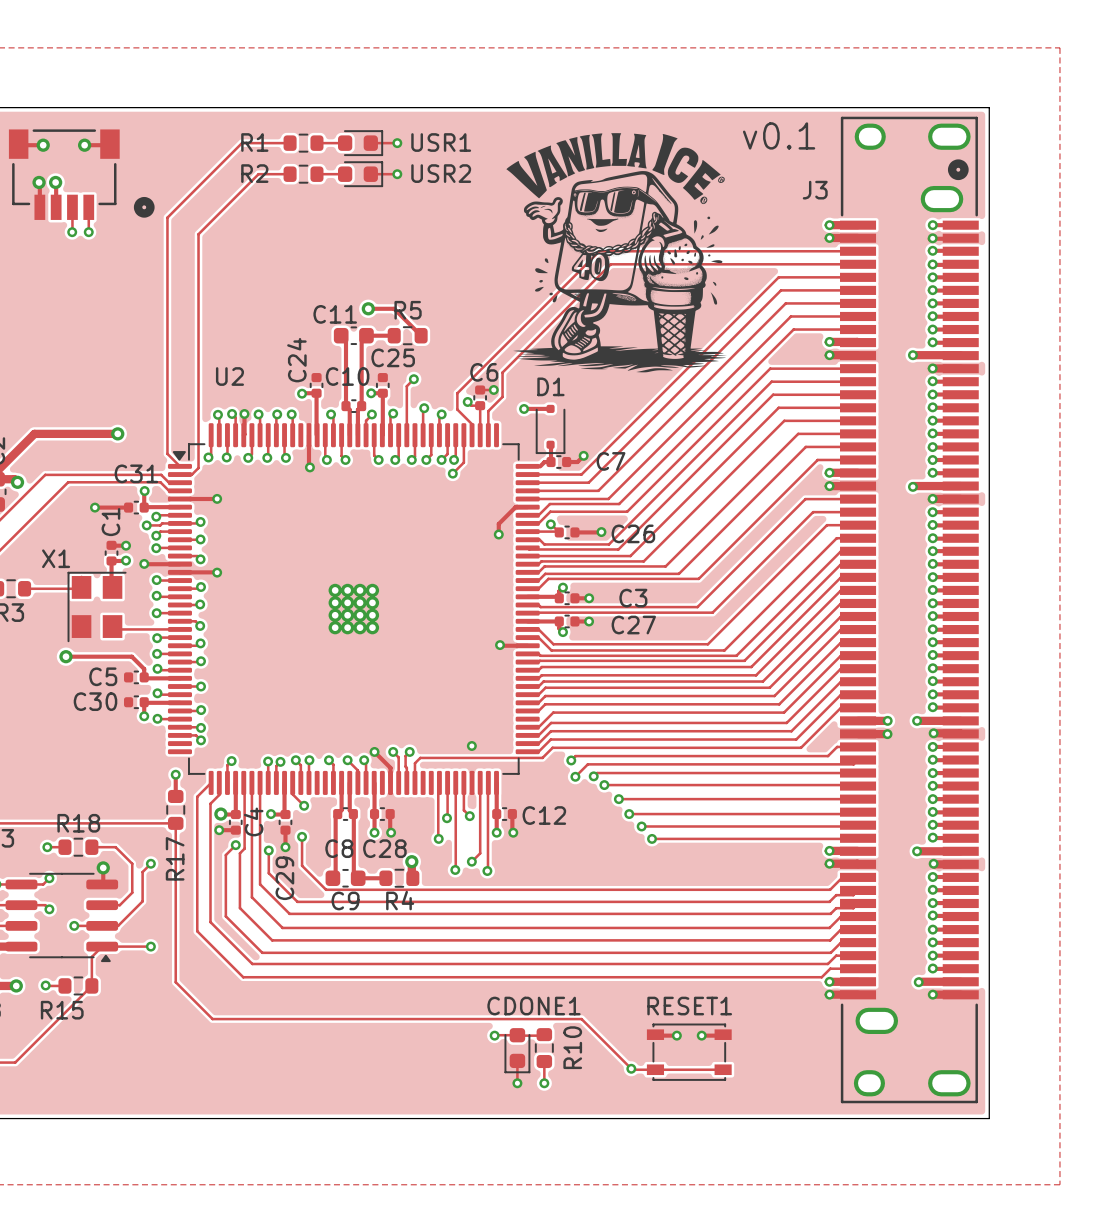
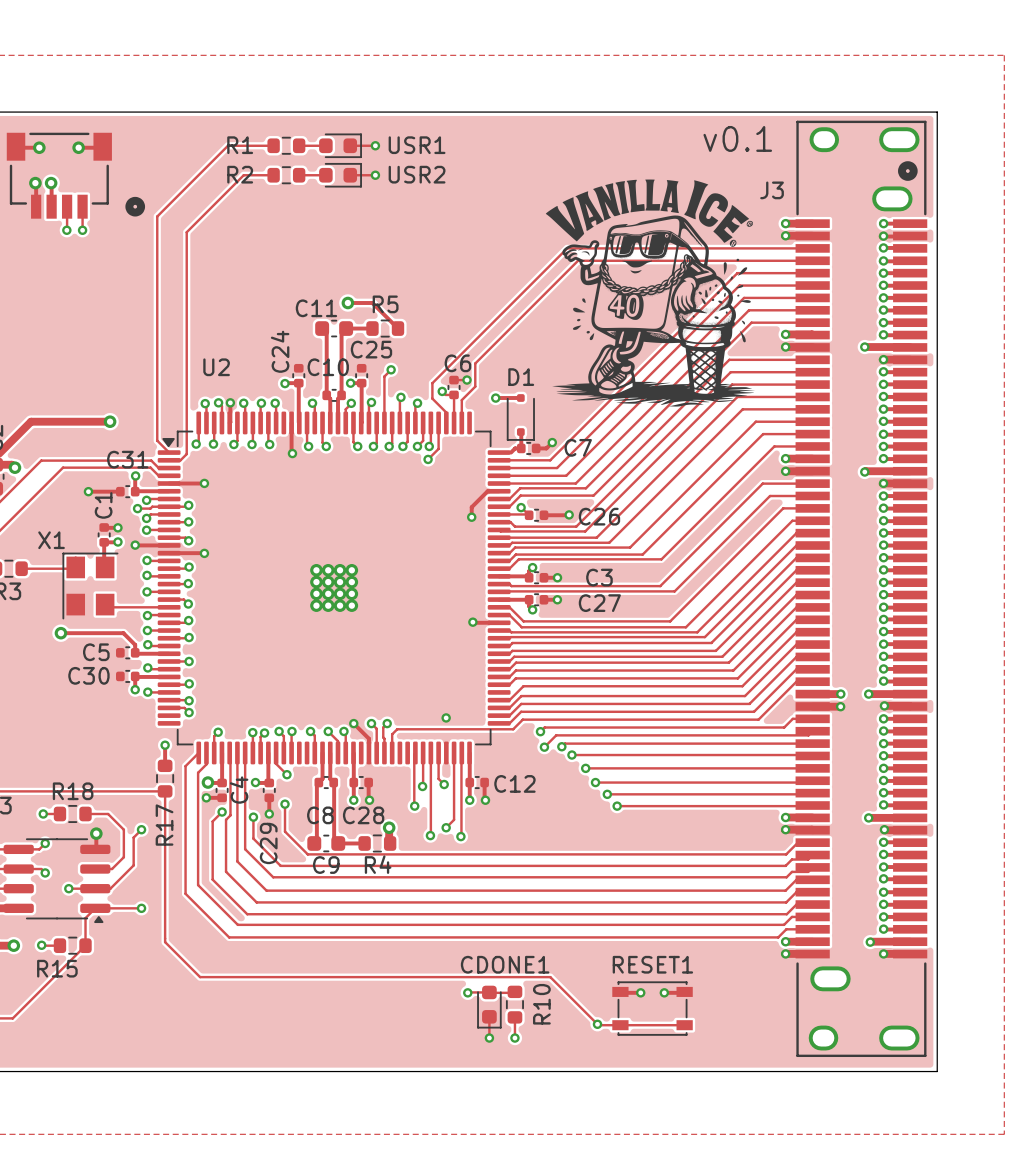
drawing position: (616, 252) -> (650, 293)

